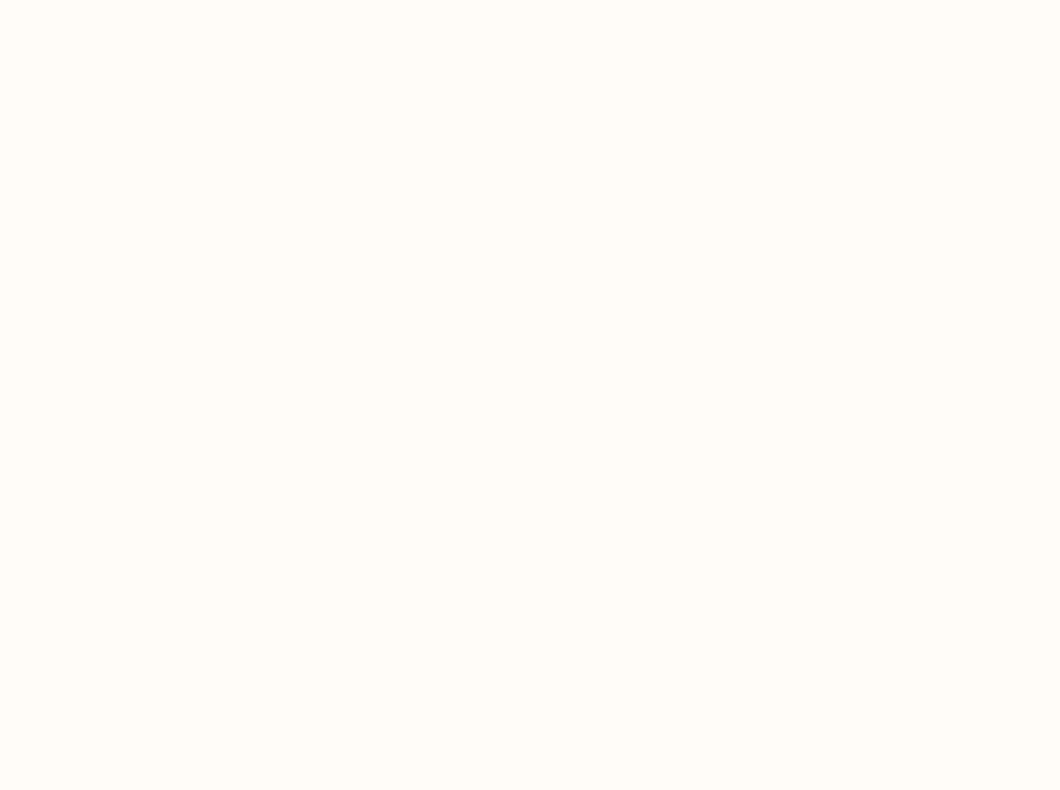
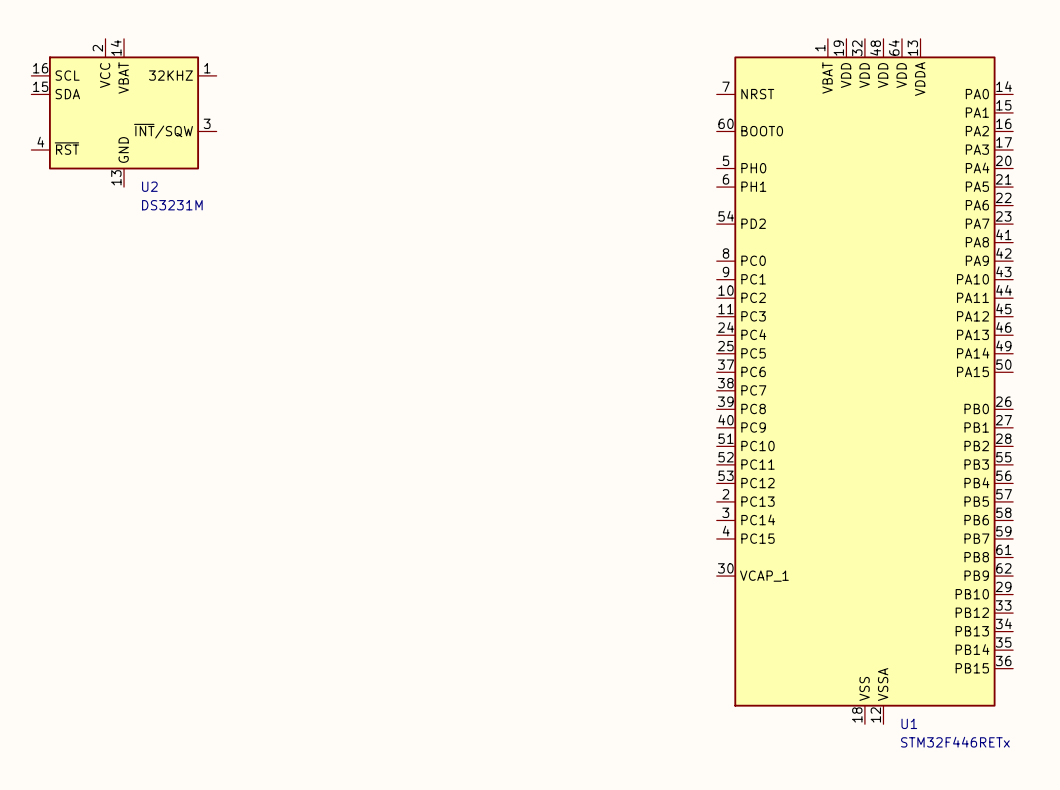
U2: none -> DS3231M (124, 112)
U1: none -> STM32F446RETx (864, 381)

